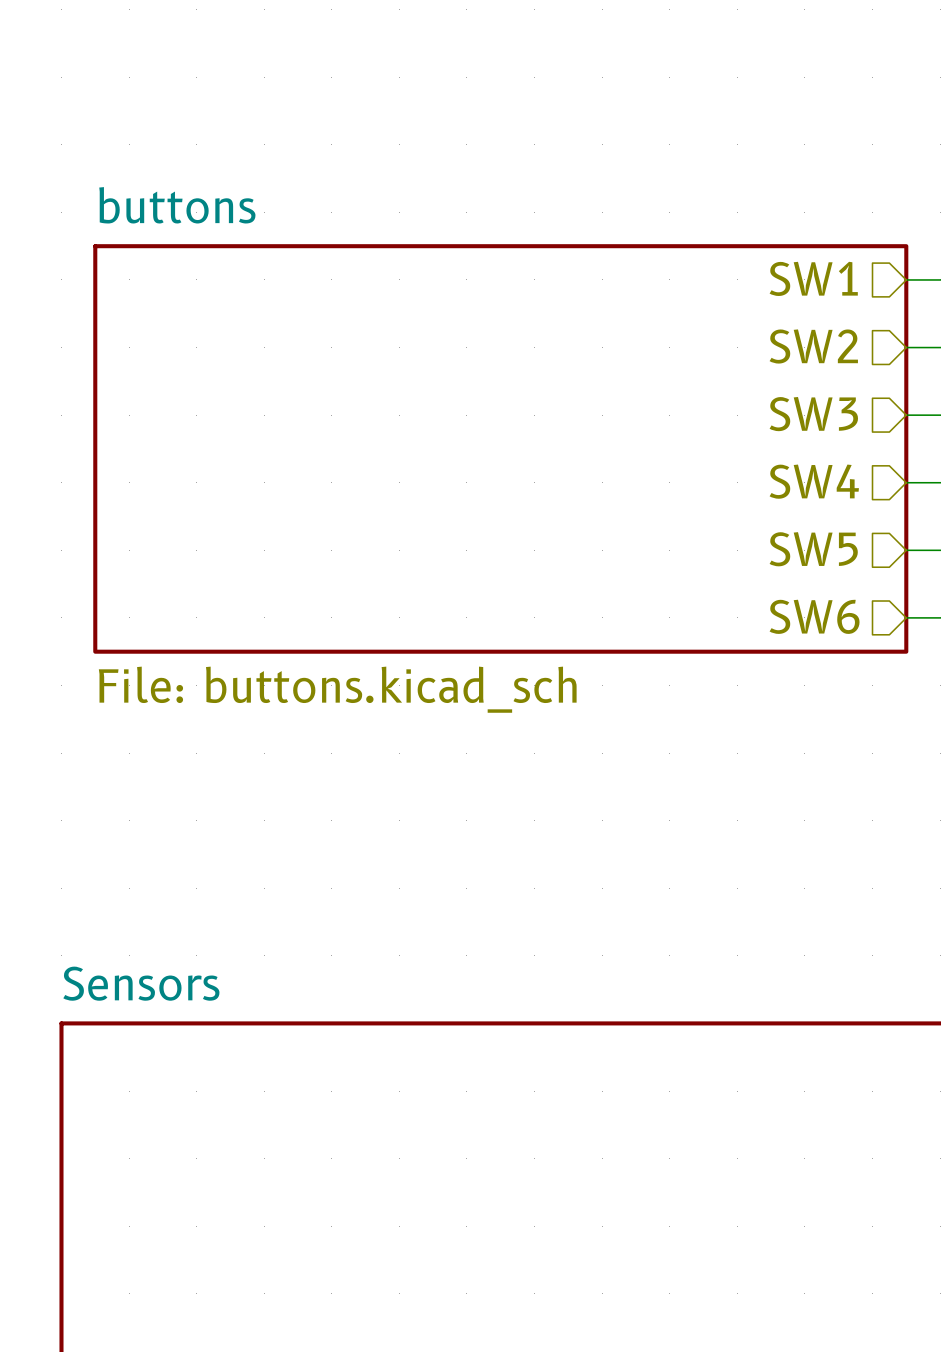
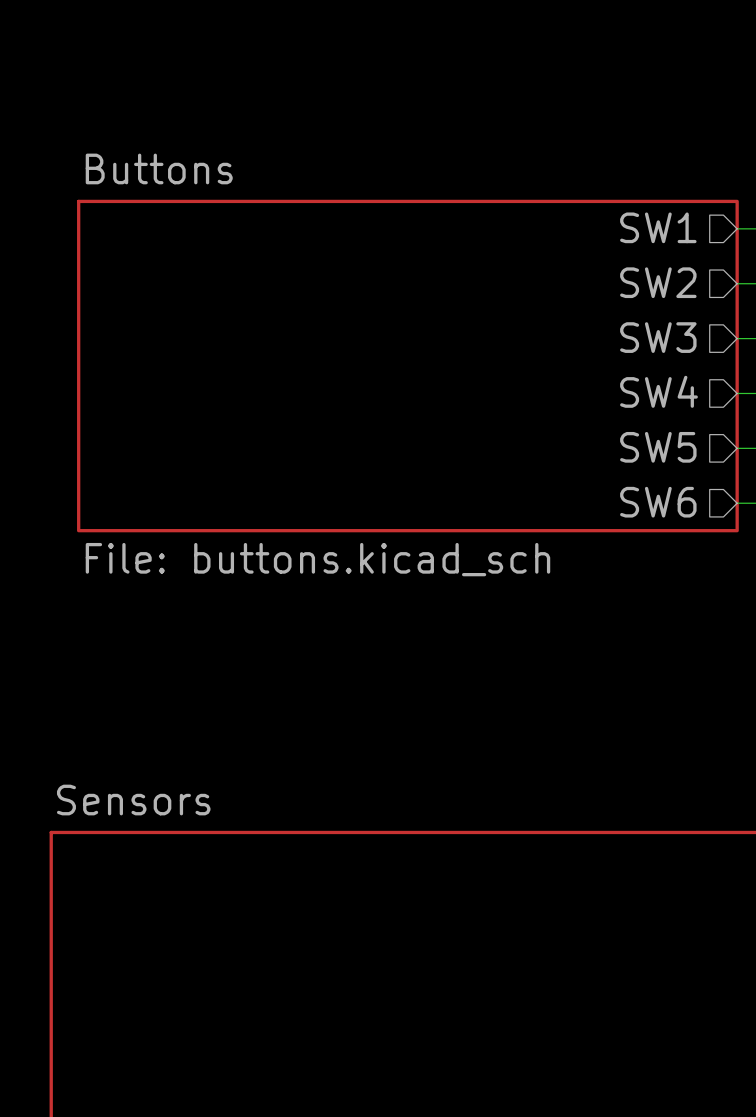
sheet buttons name: buttons (177, 205) -> Buttons (159, 168)

